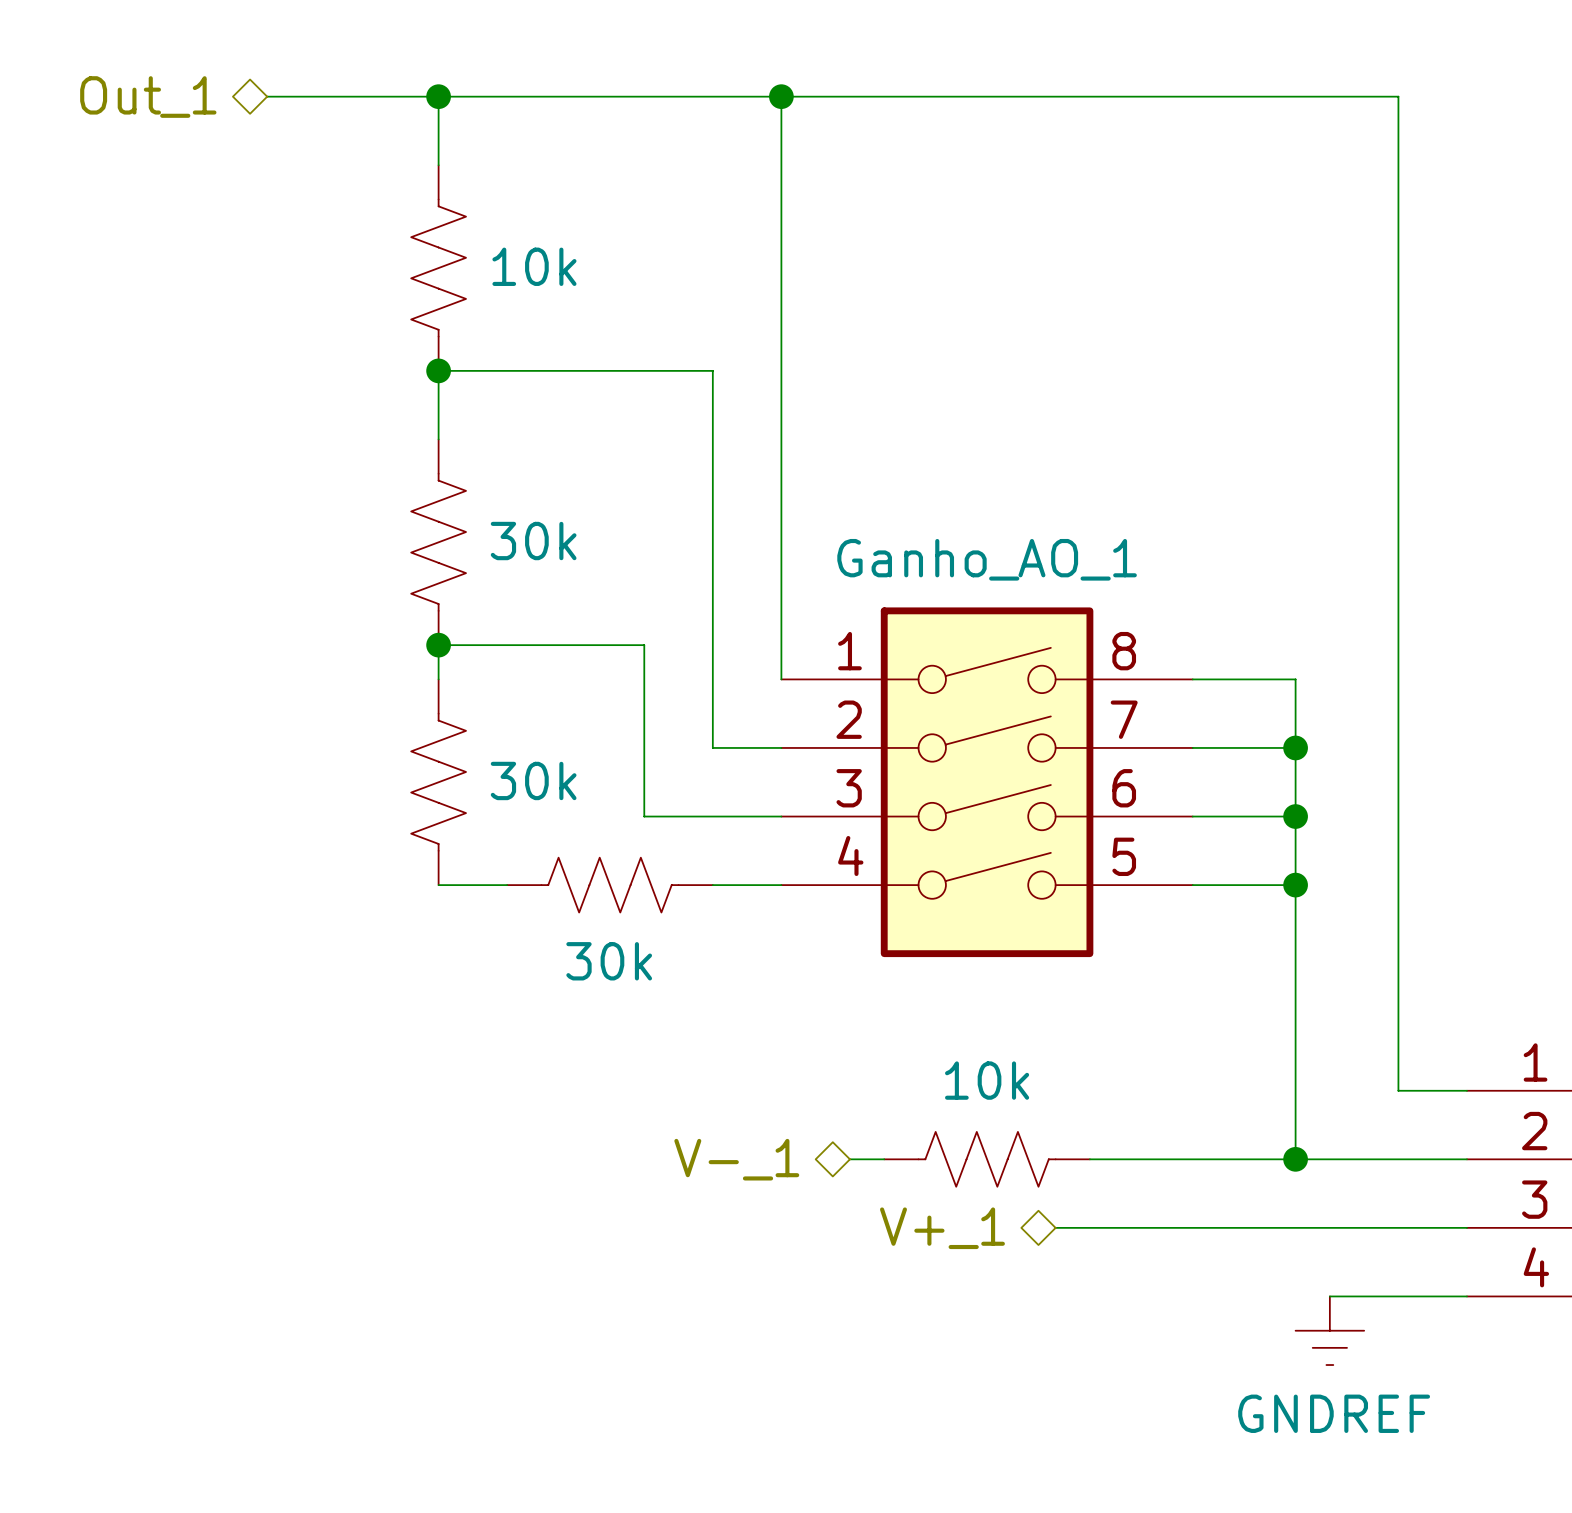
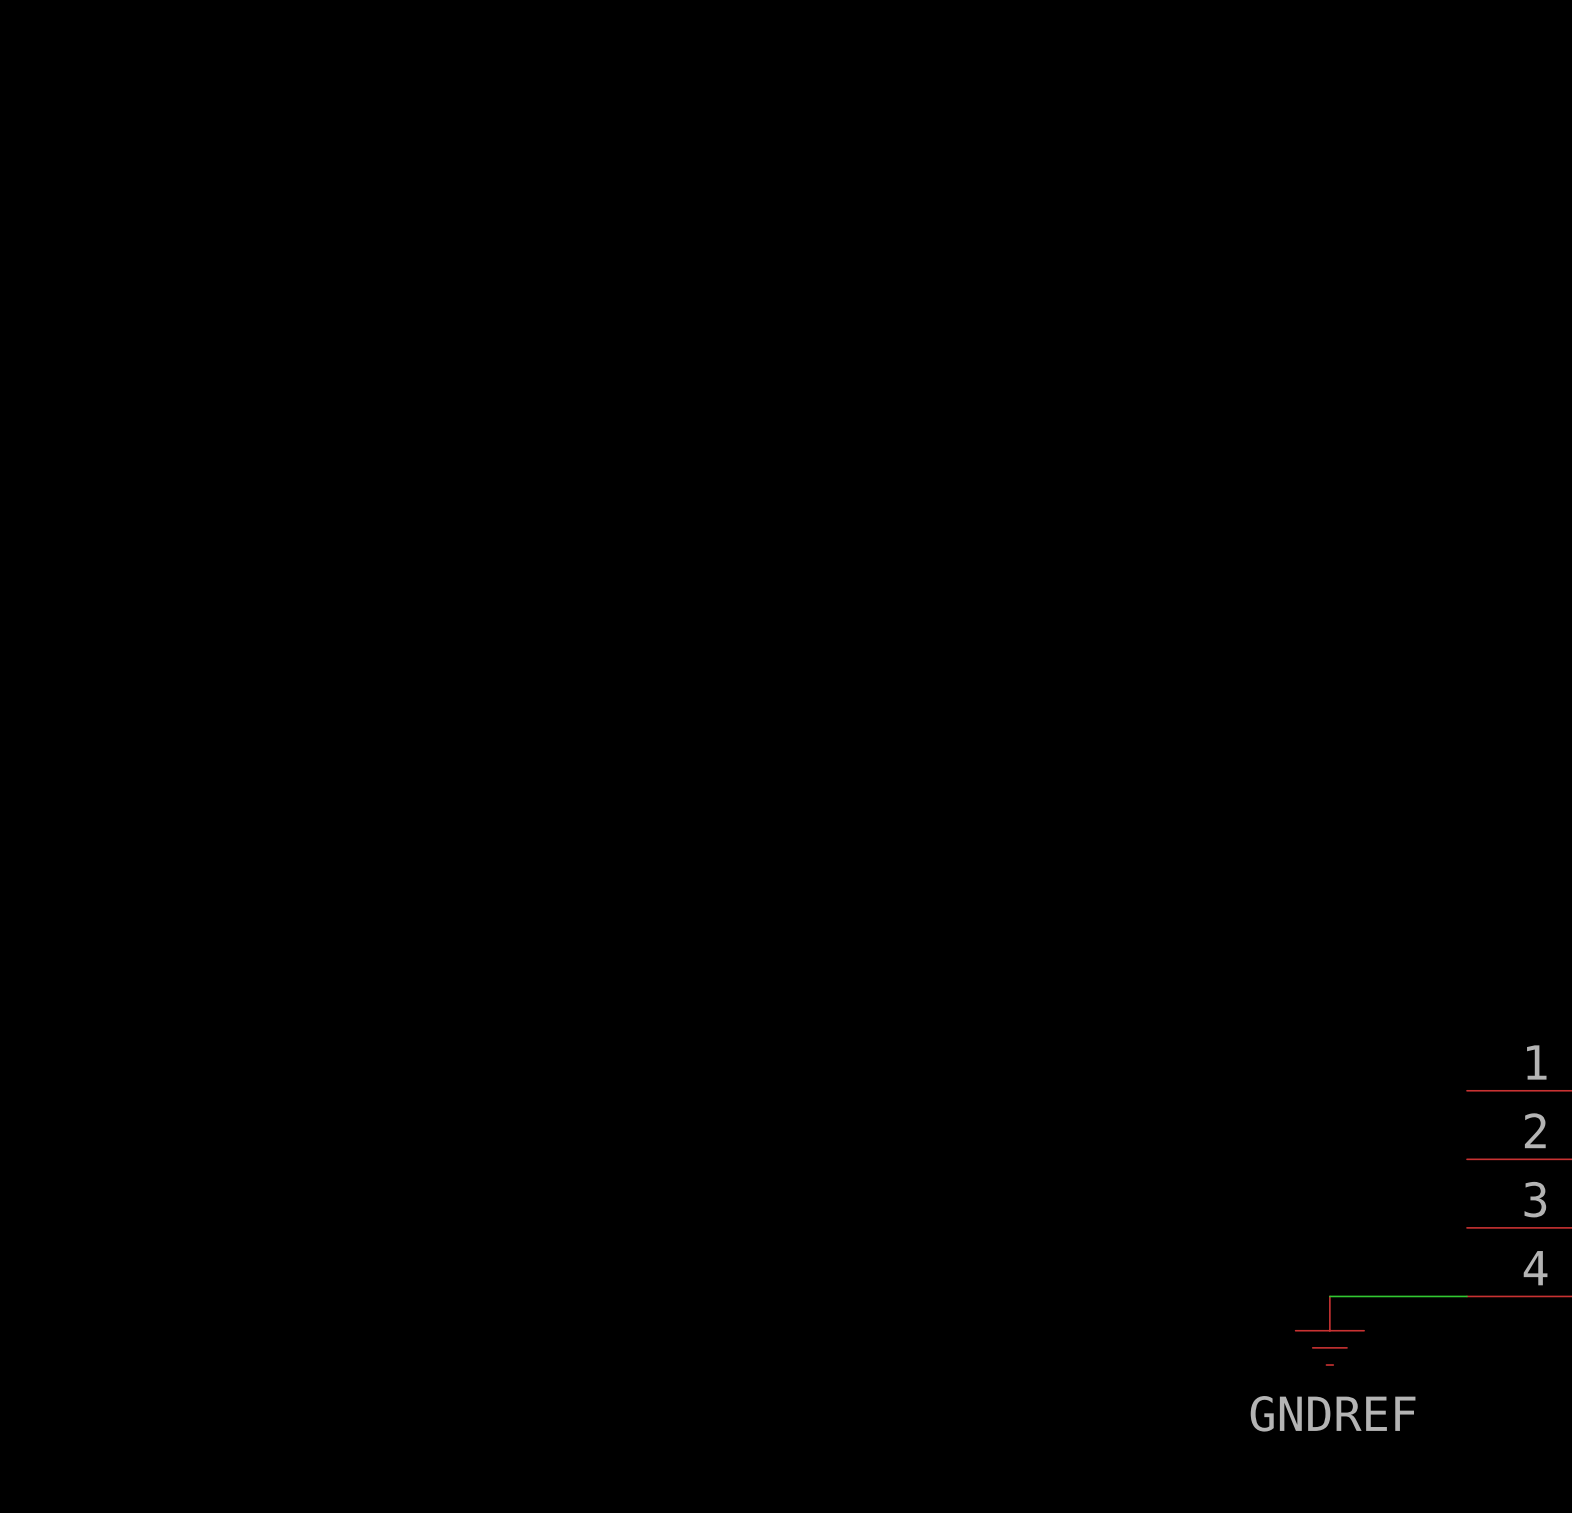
wire: (267, 96) (1398, 96) (1398, 1090) (1466, 1090) -> none
wire: (438, 96) (438, 165) -> none
junction: (438, 96) -> none
wire: (781, 96) (781, 679) -> none
junction: (781, 96) -> none
hierarchical label: Out_1 (148, 97) -> none
part: 10k (438, 268) -> none
junction: (438, 370) -> none
wire: (438, 439) (438, 370) (712, 370) (712, 747) (781, 747) -> none
part: 30k (438, 542) -> none
junction: (438, 645) -> none
wire: (438, 679) (438, 645) (644, 645) (644, 816) (781, 816) -> none
wire: (1192, 679) (1295, 679) (1295, 1159) -> none
wire: (1192, 747) (1295, 747) -> none
junction: (1295, 747) -> none
part: 30k (438, 782) -> none
Ganho_AO_1: (987, 782) -> none
wire: (1192, 816) (1295, 816) -> none
junction: (1295, 816) -> none
wire: (438, 885) (507, 885) -> none
part: 30k (610, 885) -> none
wire: (712, 885) (781, 885) -> none
wire: (1192, 885) (1295, 885) -> none
junction: (1295, 885) -> none
hierarchical label: V-_1 (736, 1159) -> none
wire: (849, 1159) (884, 1159) -> none
part: 10k (987, 1159) -> none
wire: (1089, 1159) (1466, 1159) -> none
junction: (1295, 1159) -> none
wire: (1055, 1227) (1466, 1227) -> none
hierarchical label: V+_1 (942, 1228) -> none

